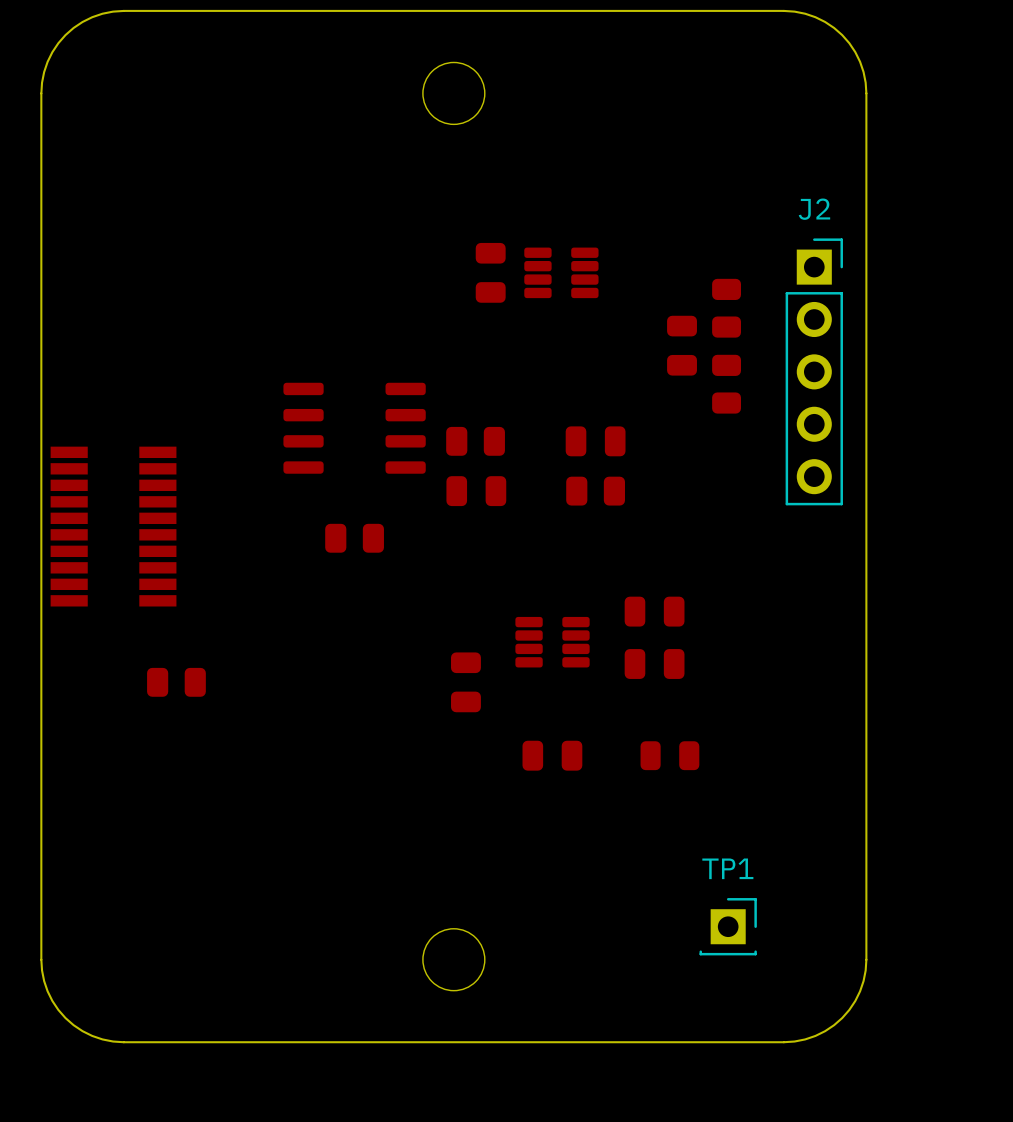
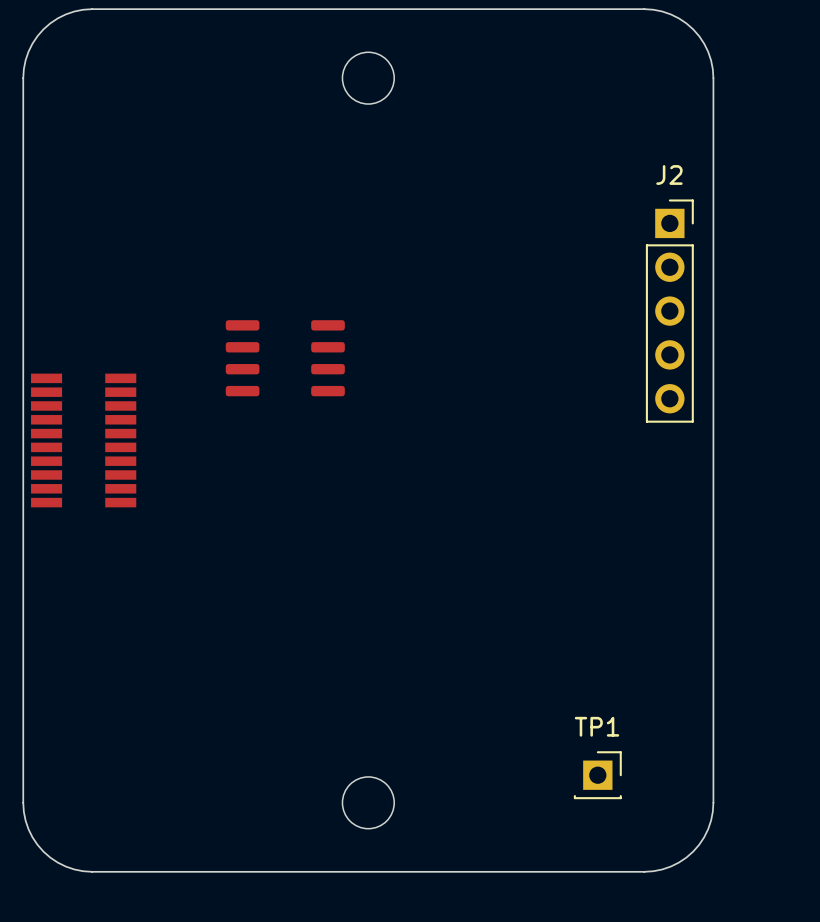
part: (490, 272) -> none
part: (561, 272) -> none
part: (726, 308) -> none
part: (682, 345) -> none
part: (726, 384) -> none
part: (475, 441) -> none
part: (595, 441) -> none
part: (476, 491) -> none
part: (595, 491) -> none
part: (354, 538) -> none
part: (654, 611) -> none
part: (552, 642) -> none
part: (654, 664) -> none
part: (176, 682) -> none
part: (465, 682) -> none
part: (552, 755) -> none
part: (669, 755) -> none

